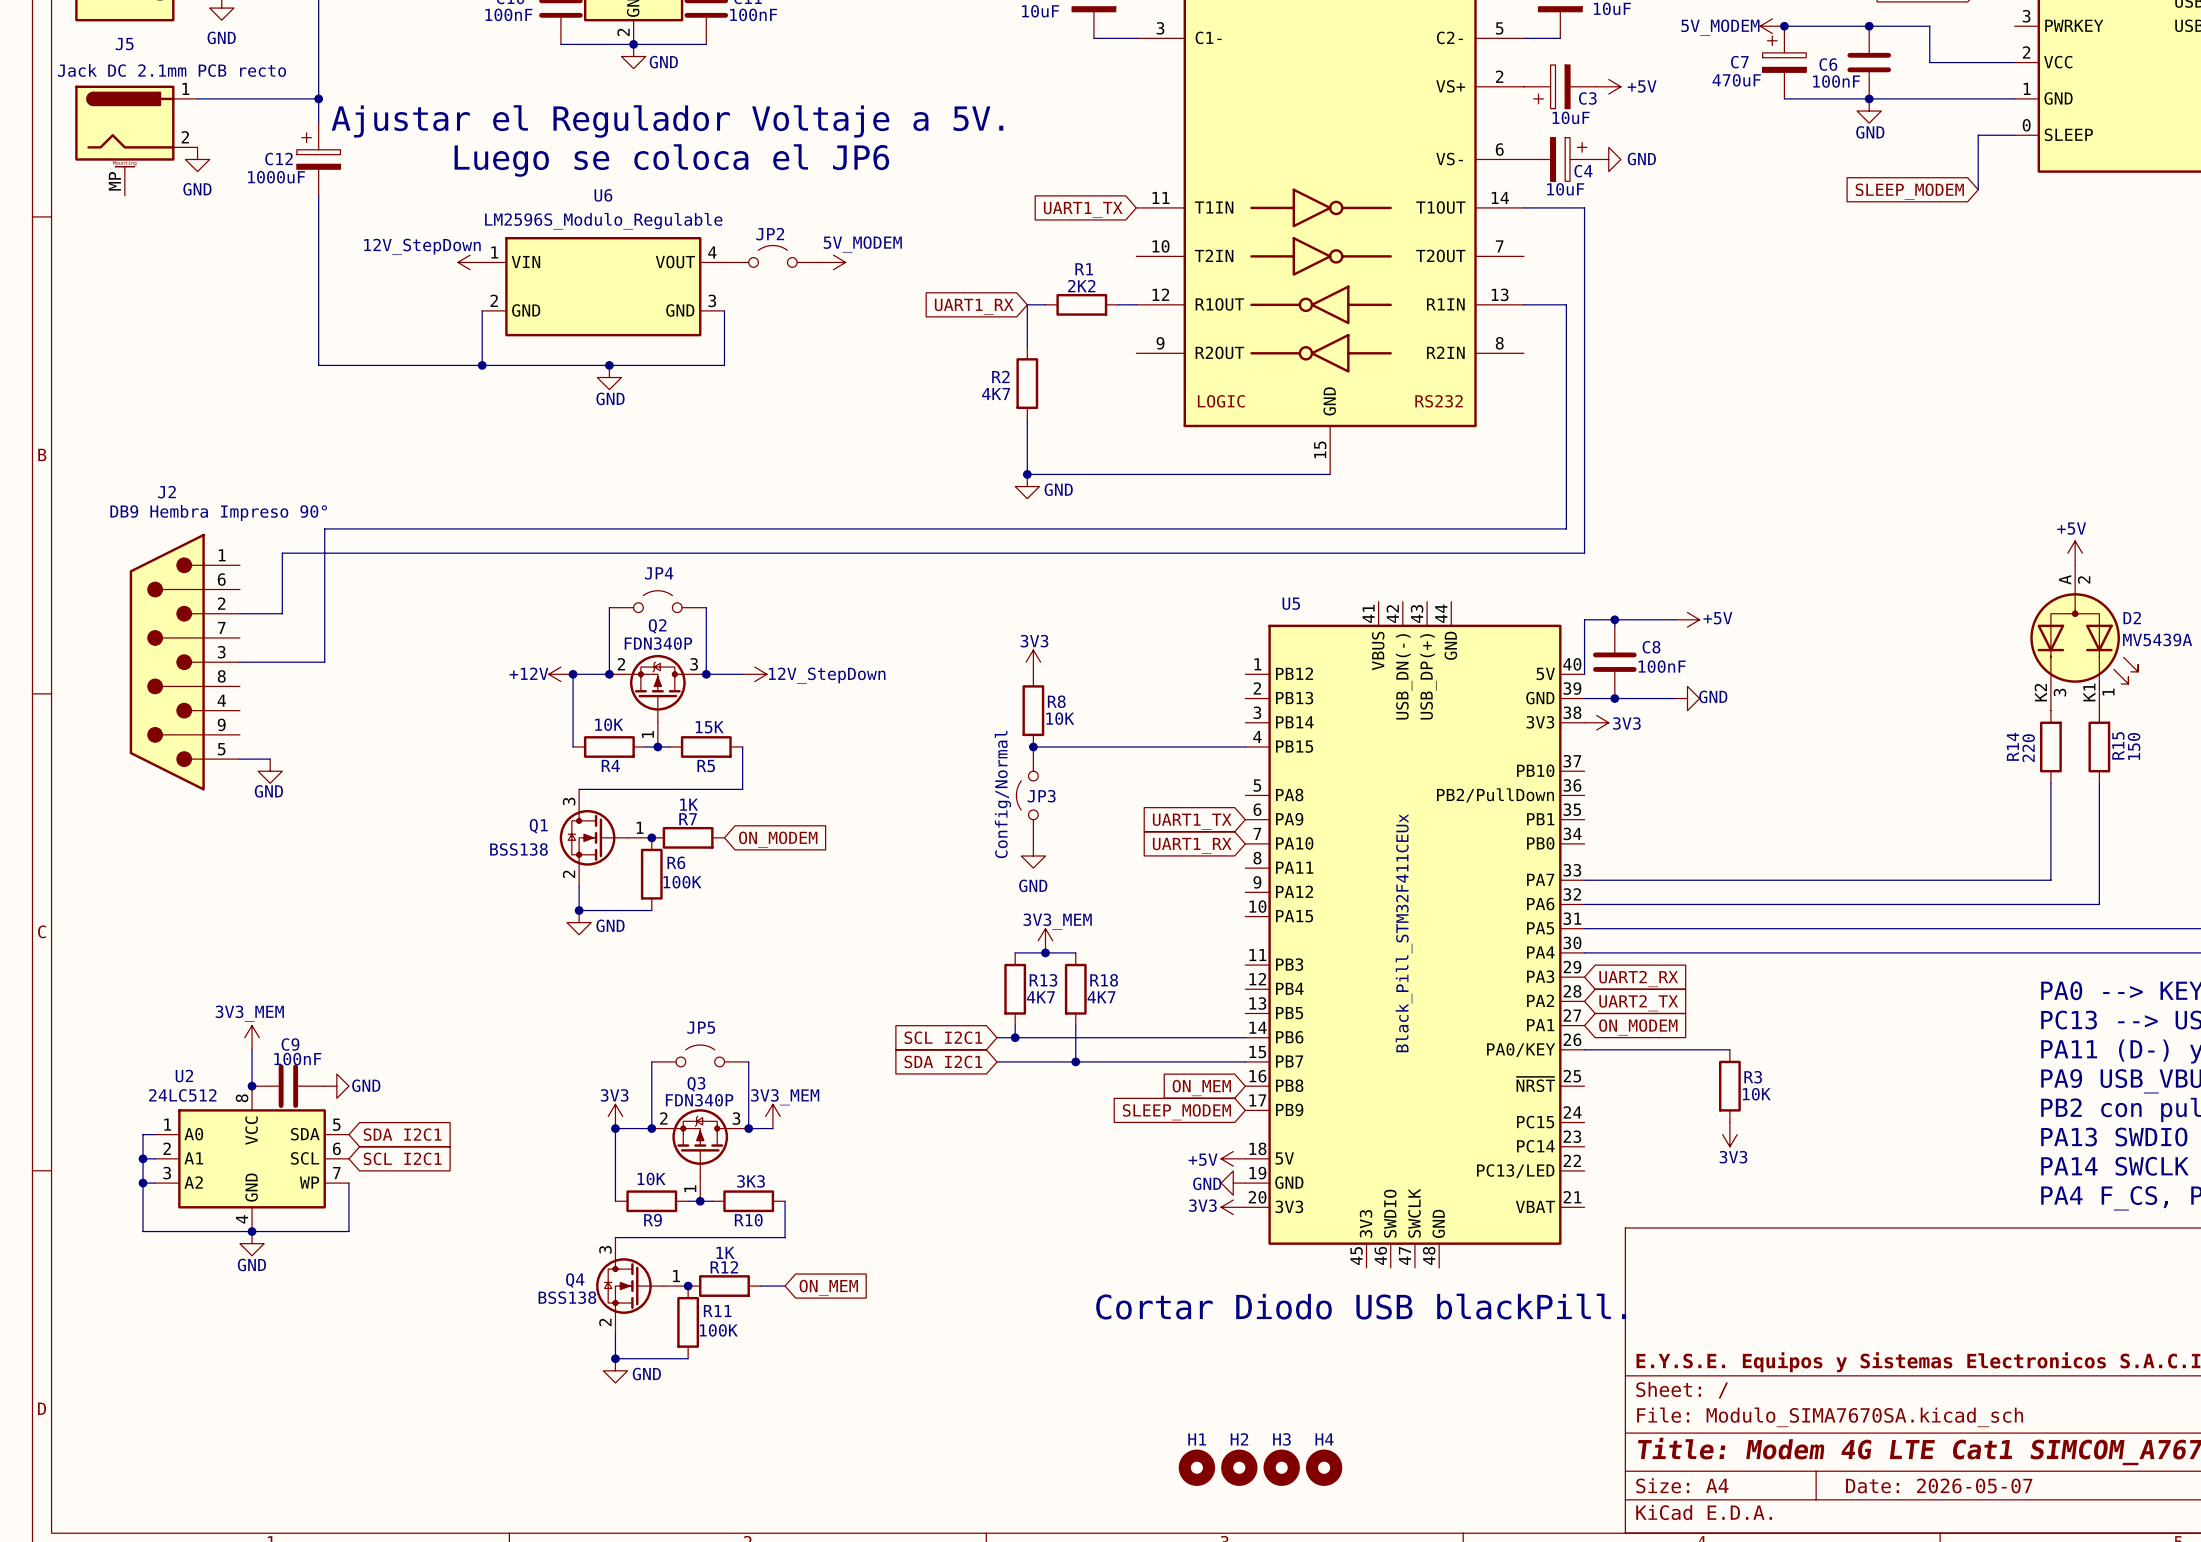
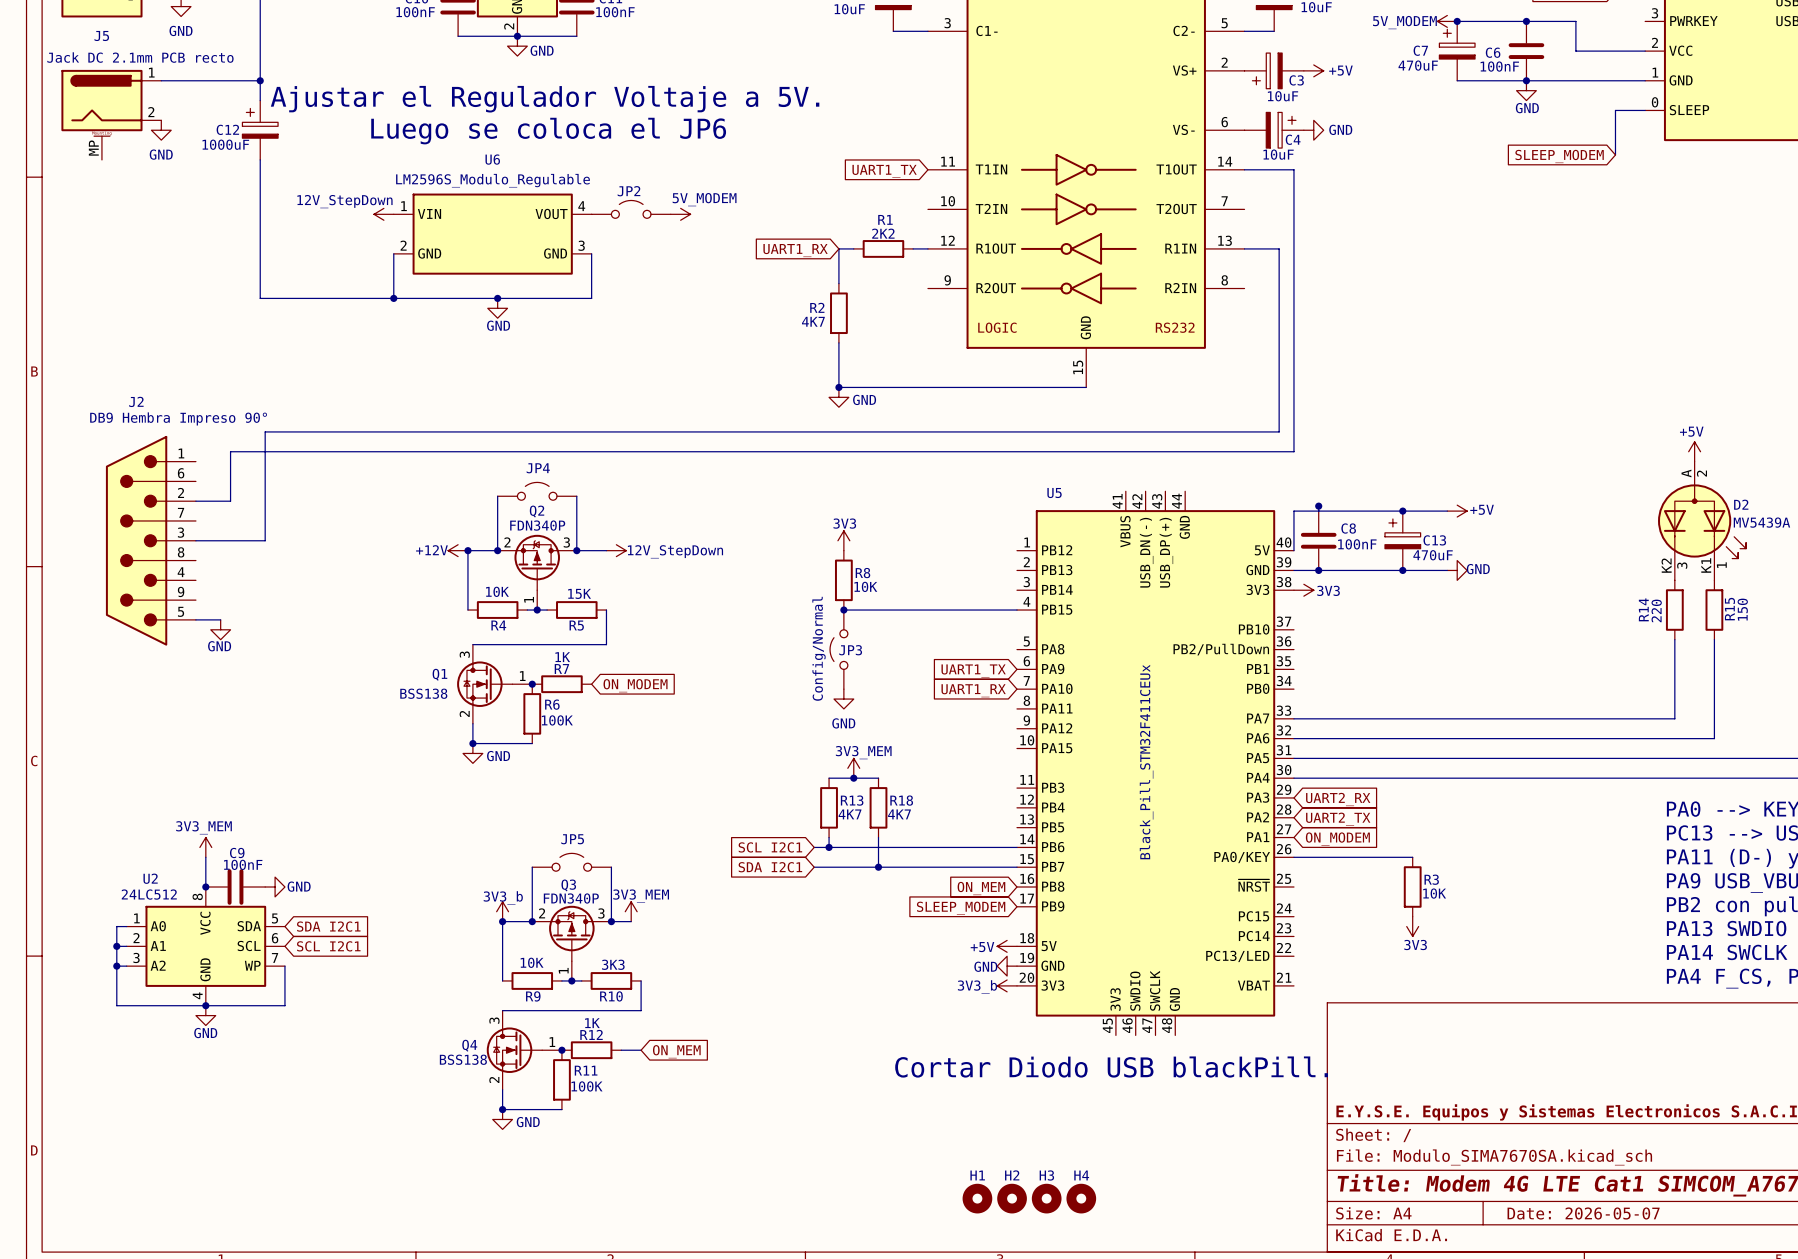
wire: (1675, 619) (1584, 619) (1584, 625) -> (1447, 511) (1293, 511)
power symbol position: +5V (1687, 619) -> +5V (1457, 511)
junction: none -> (1402, 511)
C13: none -> 470uF (1402, 540)
wire: none -> (1368, 570) (1447, 570)
power symbol position: GND (1687, 698) -> GND (1457, 570)
junction: none -> (1402, 570)
power symbol: 3V3 (615, 1116) -> 3V3_b (502, 911)
power symbol: 3V3 (1233, 1207) -> 3V3_b (1007, 985)

